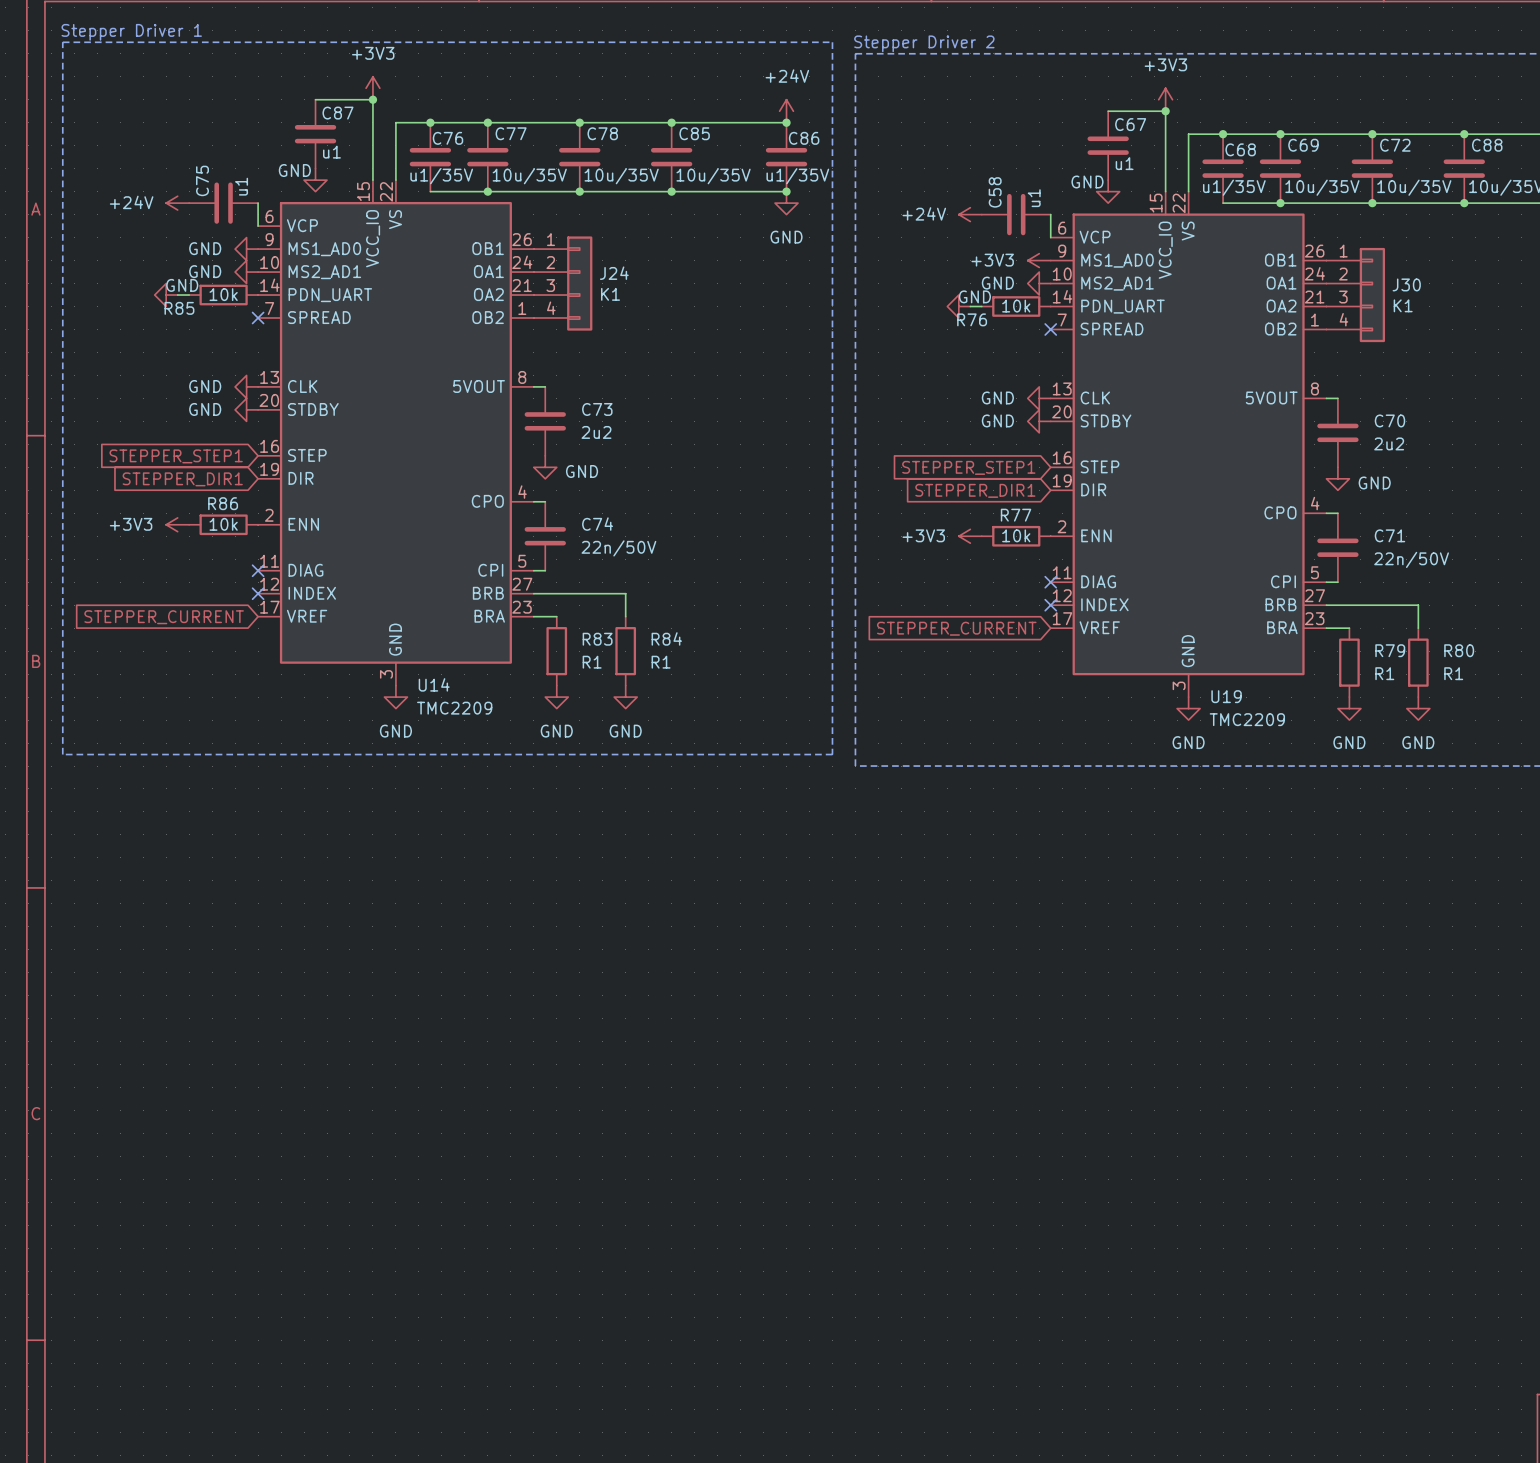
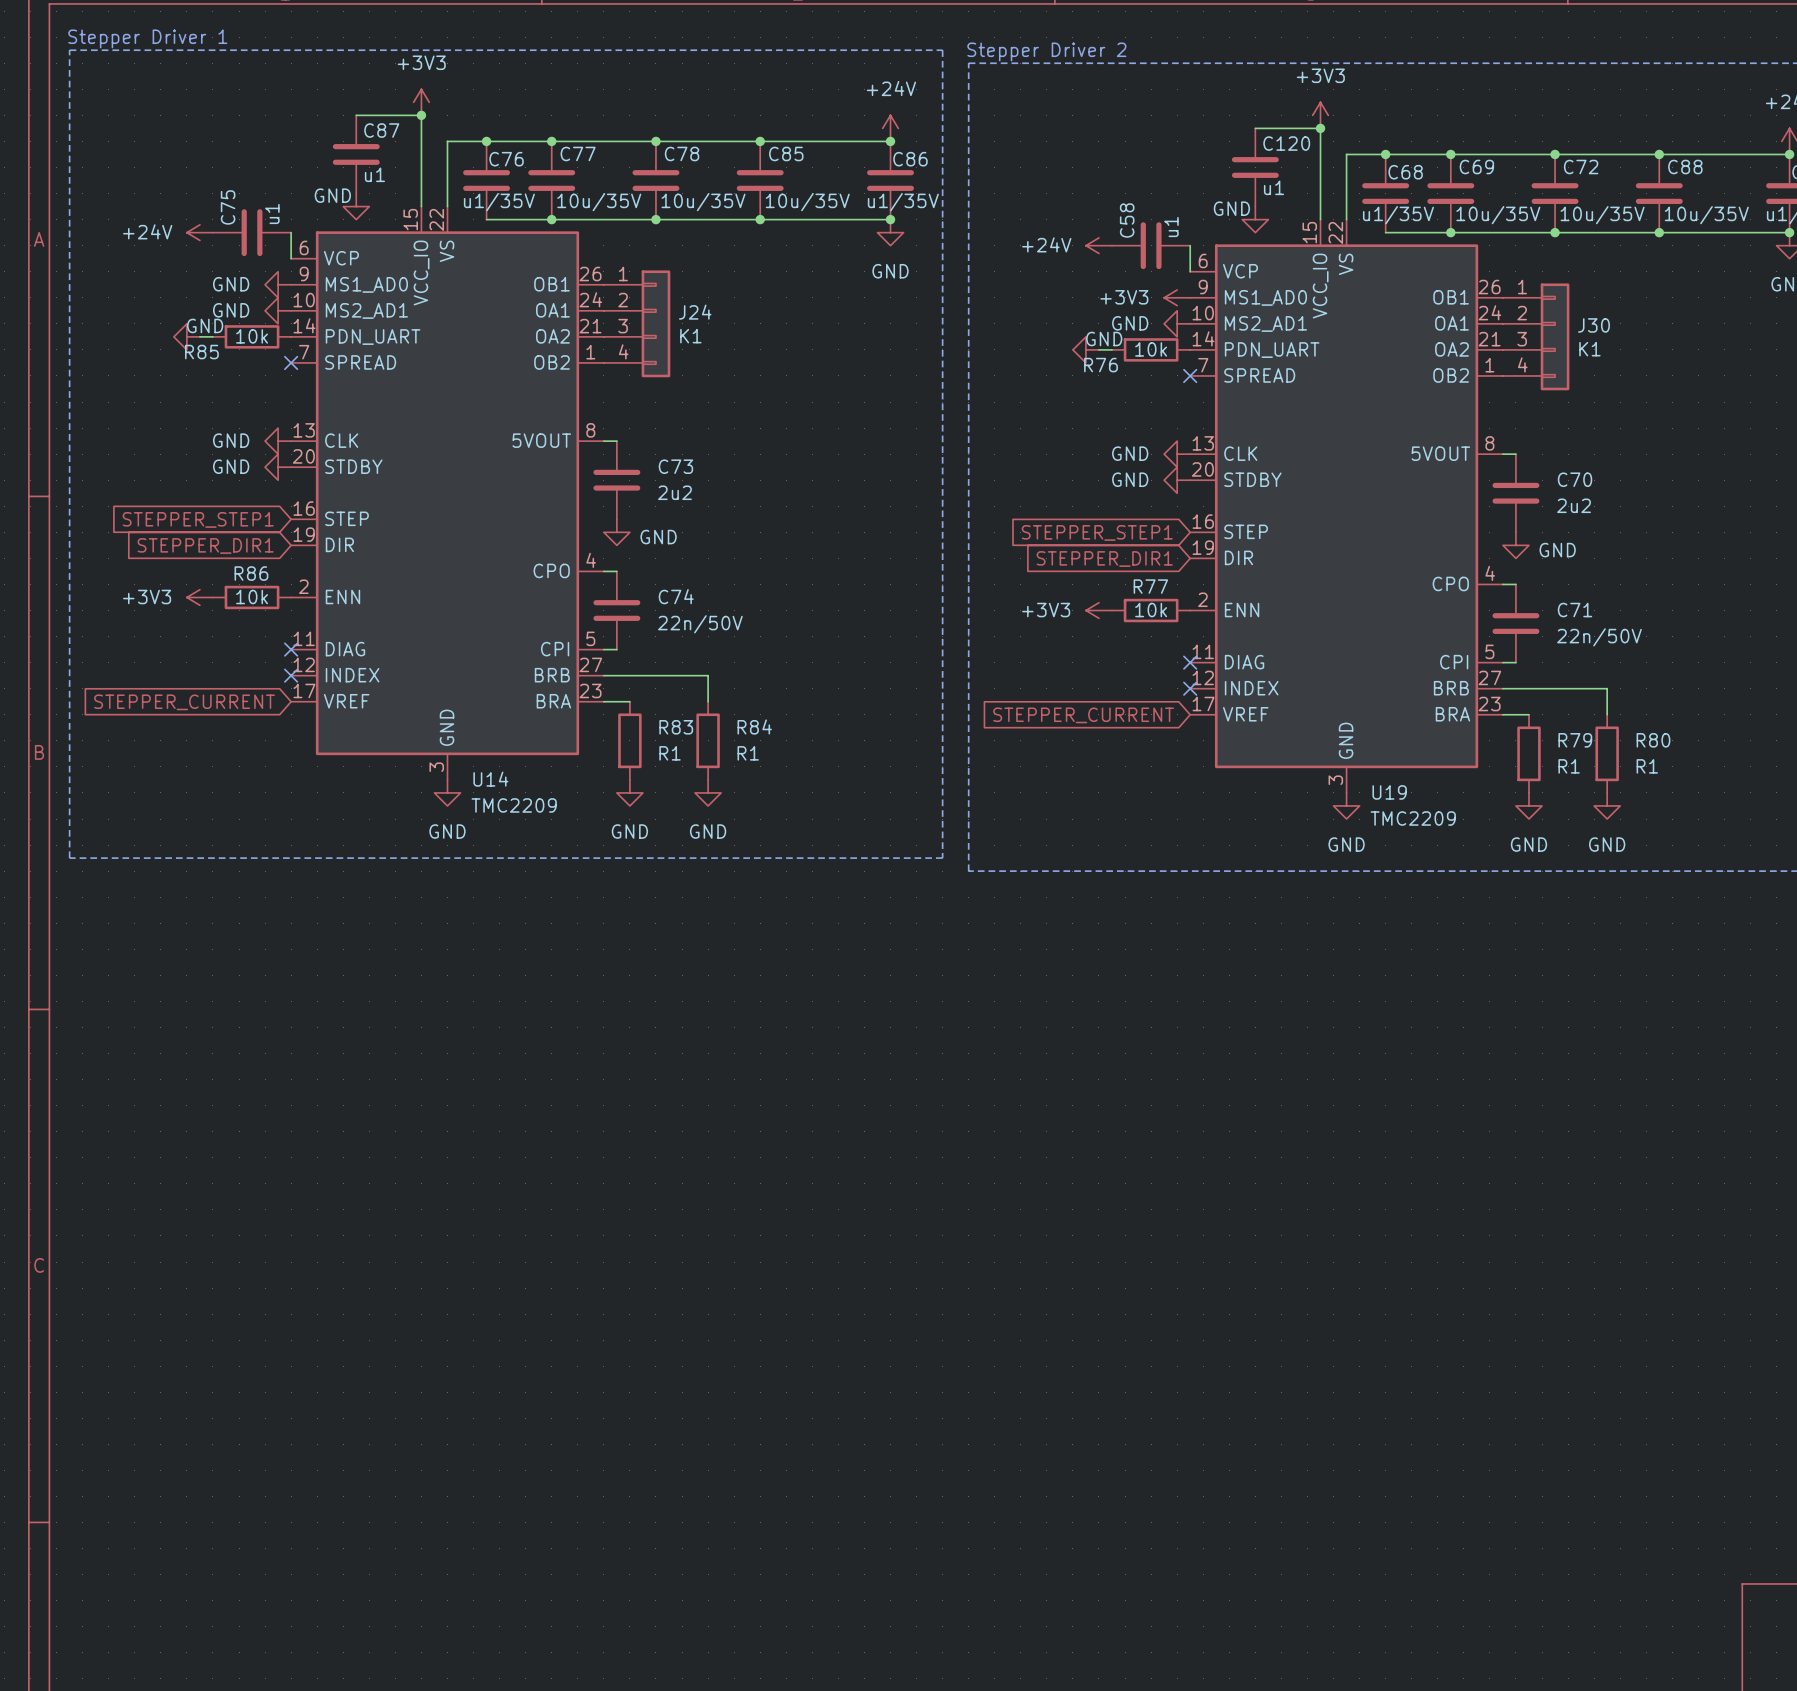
C67 name: C67 (1130, 124) -> C120 (1286, 143)

